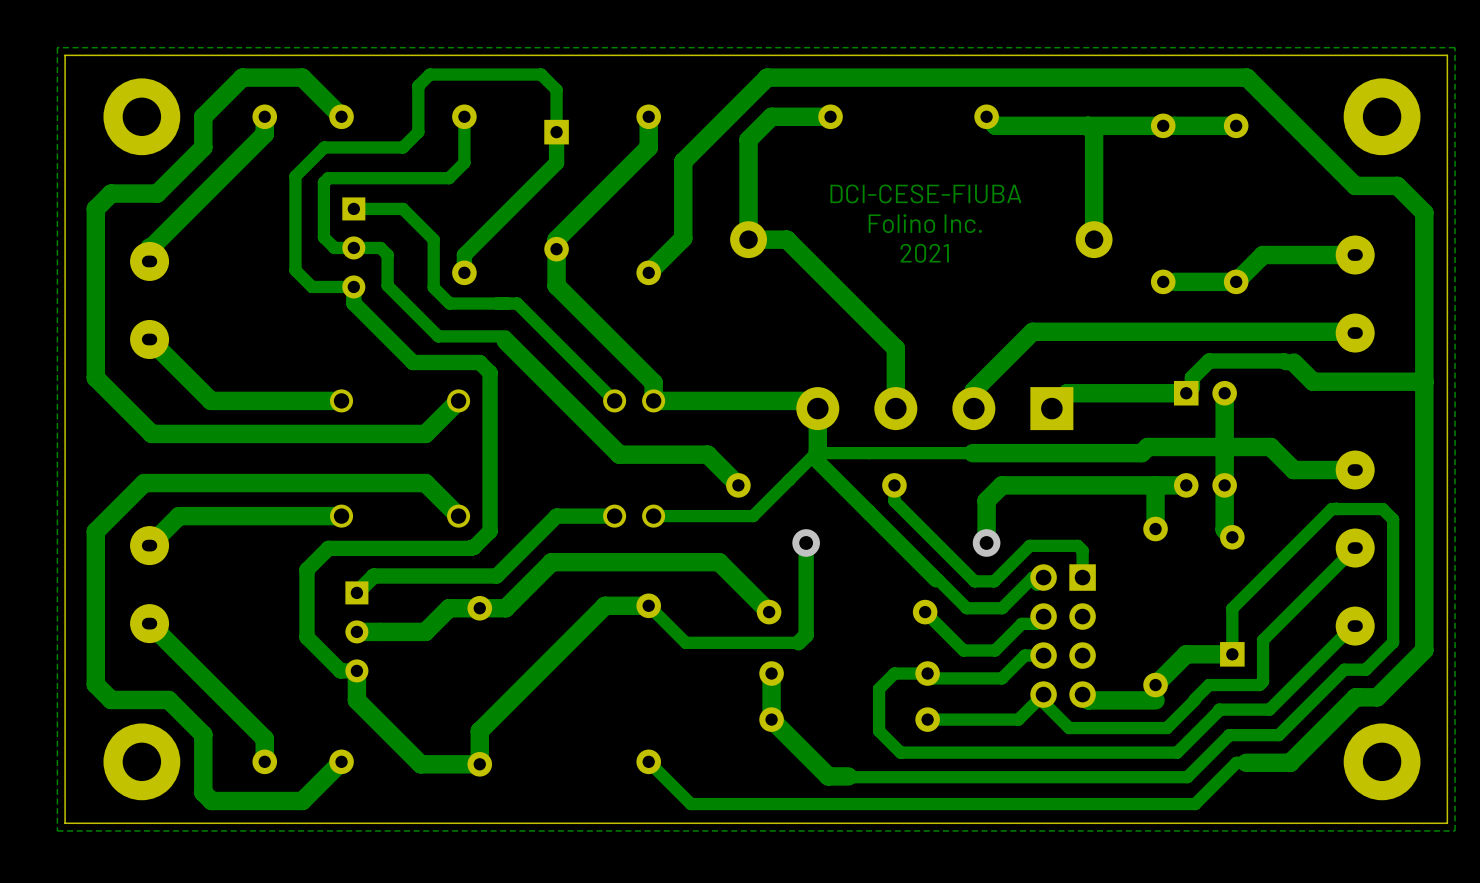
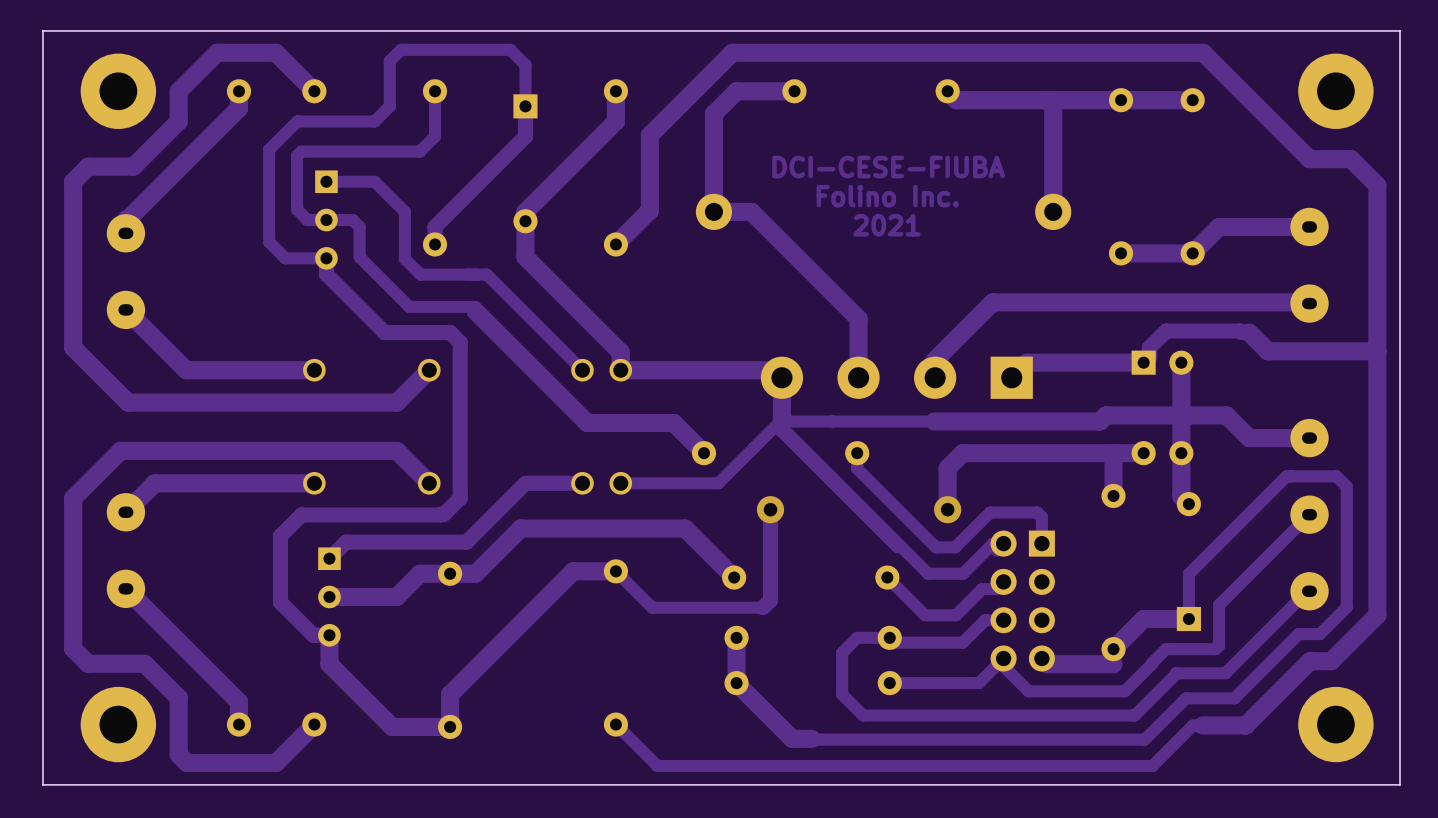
zone outline: (1455, 47) (1455, 830) (57, 830) (57, 47) (1455, 47) -> none

